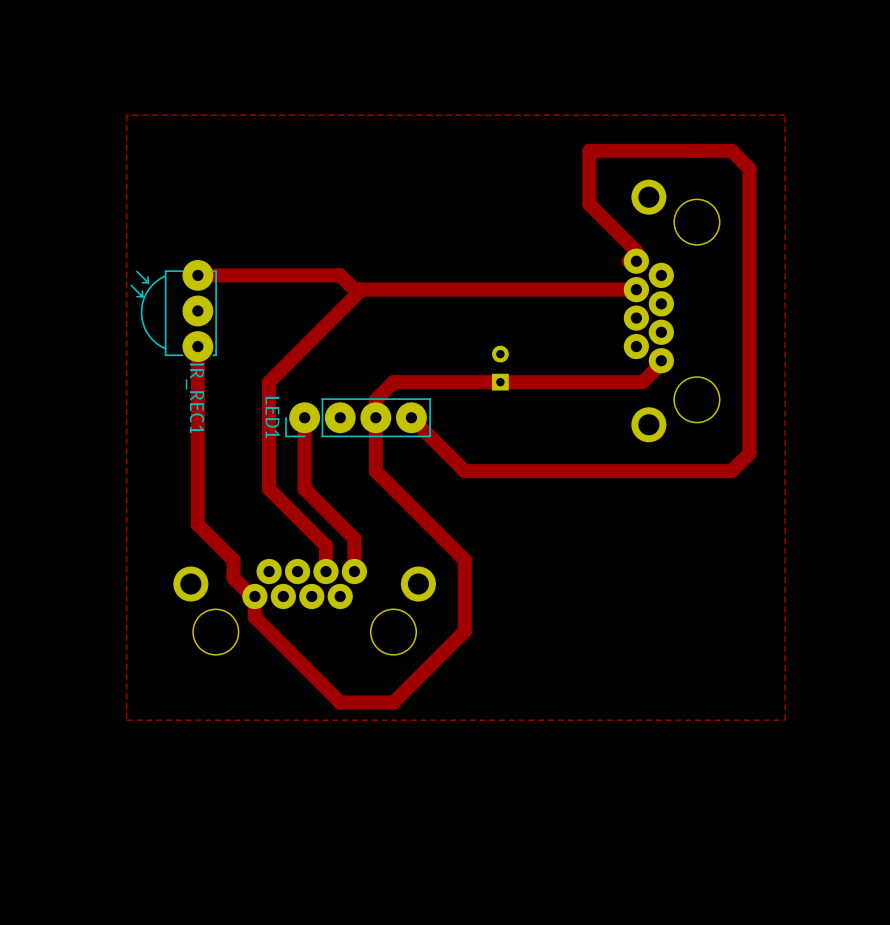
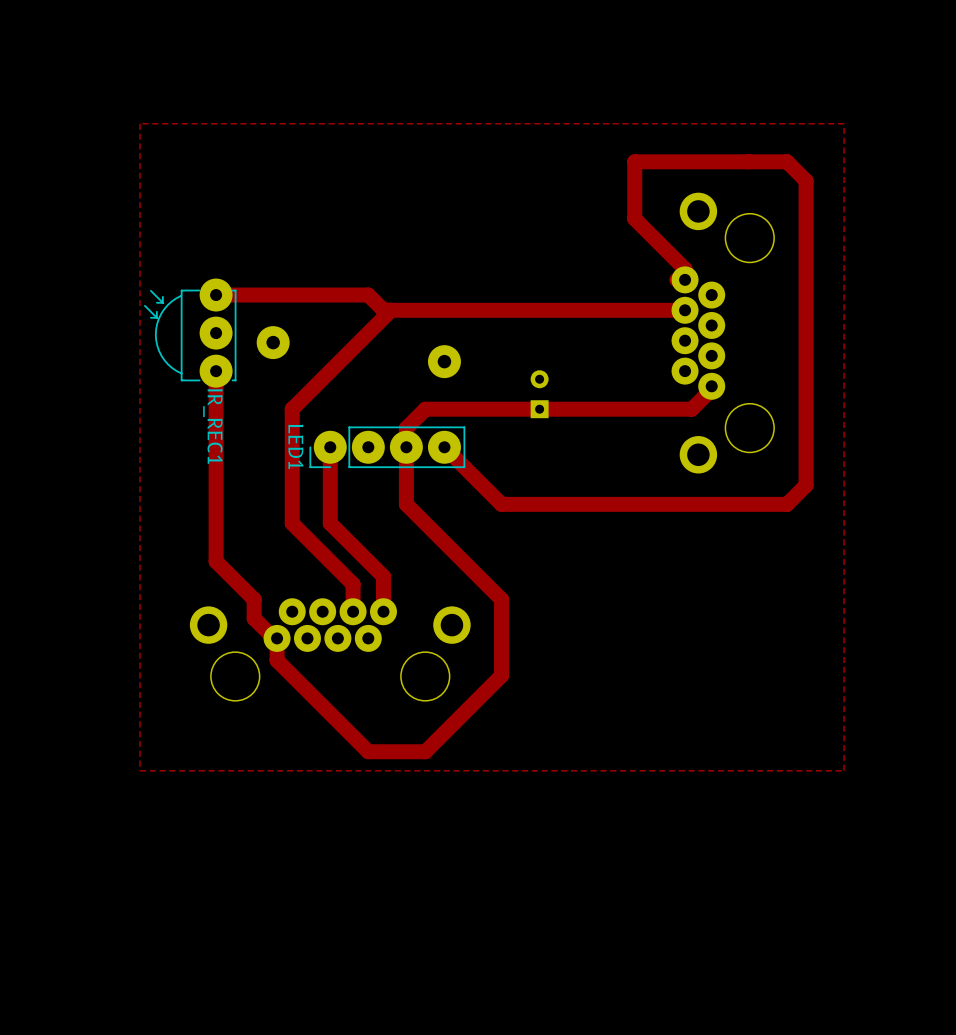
part: none -> (273, 342)
part: none -> (444, 361)

